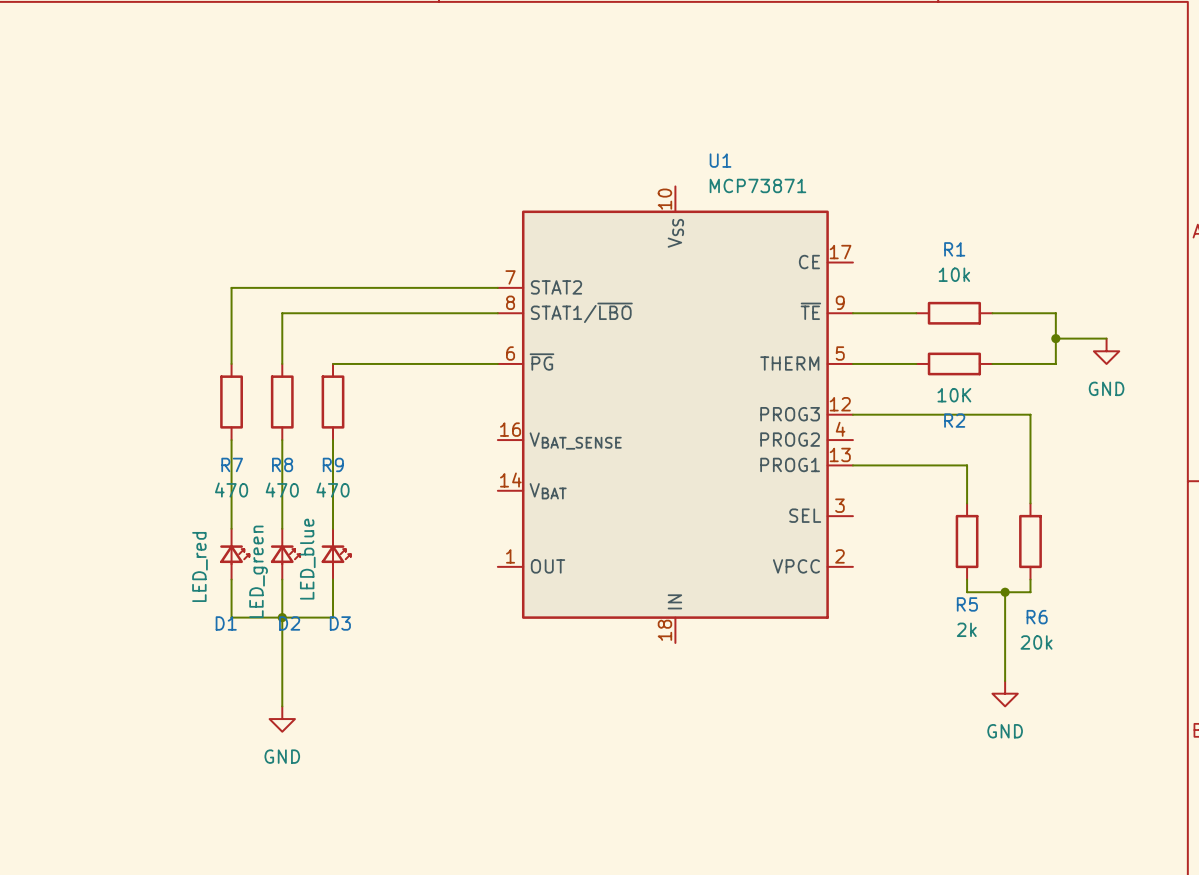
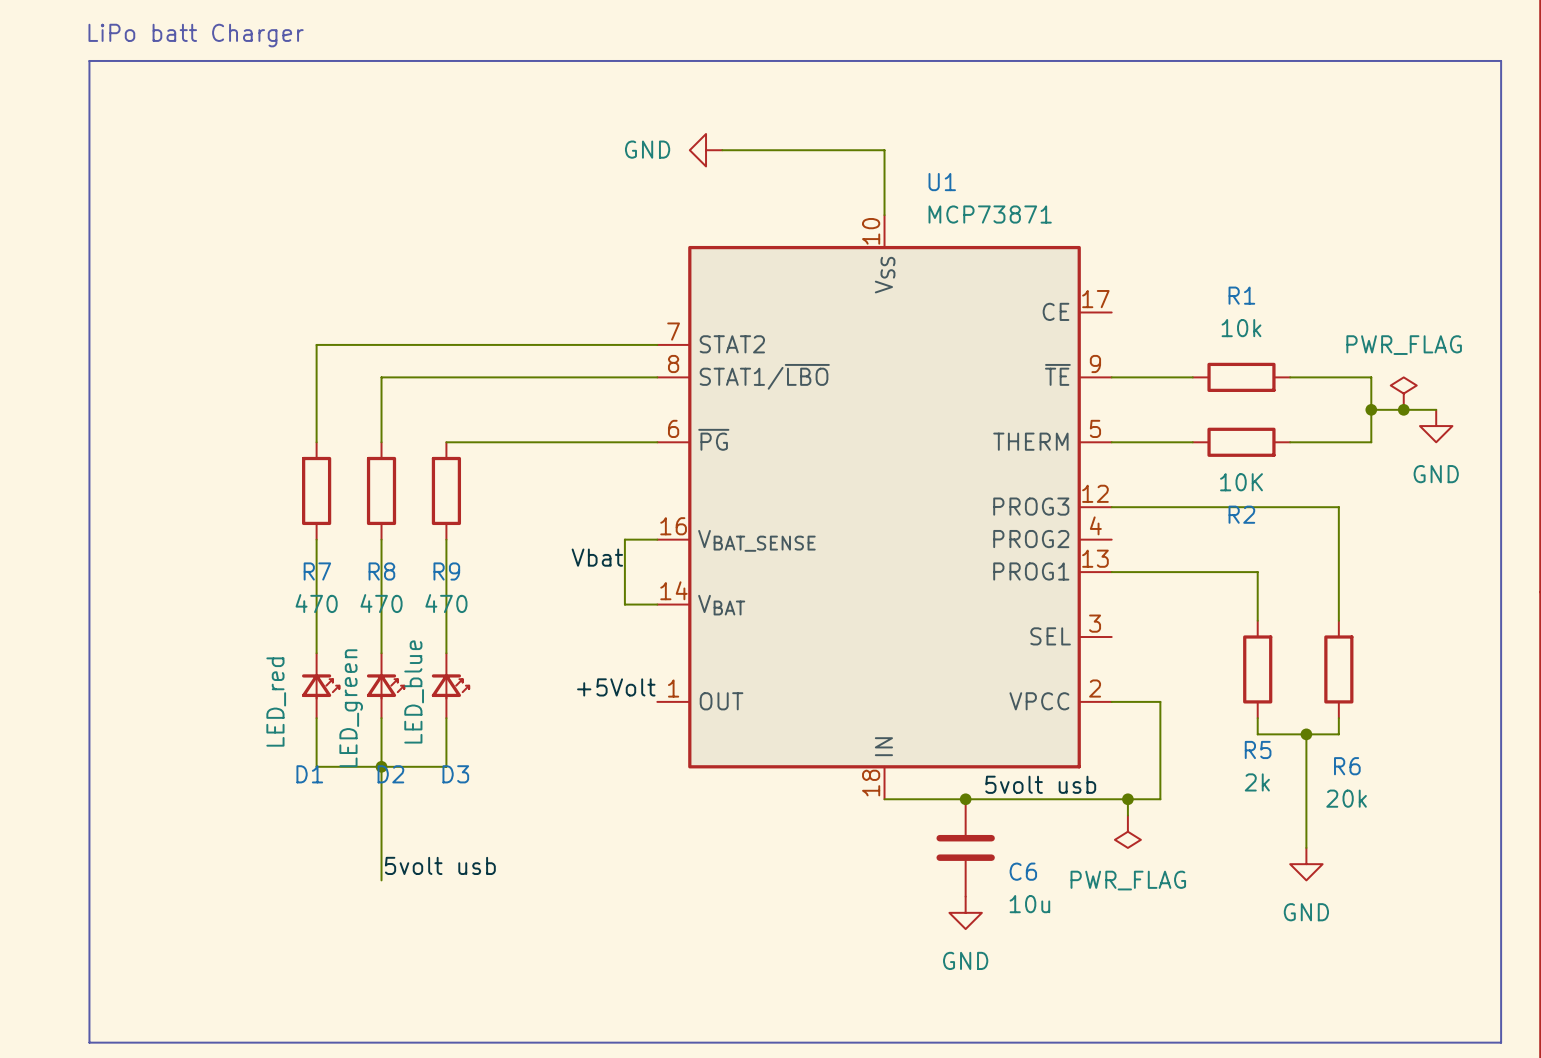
text: none -> LiPo batt Charger (196, 35)
line: none -> (89, 60) (1501, 60) (1501, 1042) (89, 1042) (89, 60)
power symbol: none -> GND (706, 150)
wire: none -> (722, 150) (884, 150) (884, 215)
power symbol: none -> PWR_FLAG (1403, 393)
junction: none -> (1403, 409)
wire: none -> (657, 539) (624, 539) (624, 604) (657, 604)
label: none -> Vbat (597, 557)
label: none -> +5Volt (616, 687)
wire: none -> (1111, 701) (1160, 701) (1160, 799) (884, 799)
label: none -> 5volt usb (1040, 784)
junction: none -> (965, 799)
wire: none -> (1127, 799) (1127, 815)
junction: none -> (1127, 799)
power symbol: none -> PWR_FLAG (1127, 831)
C6: none -> 10u (965, 847)
label: none -> 5volt usb (440, 865)
power symbol: GND (282, 719) -> none
power symbol: none -> GND (965, 912)

